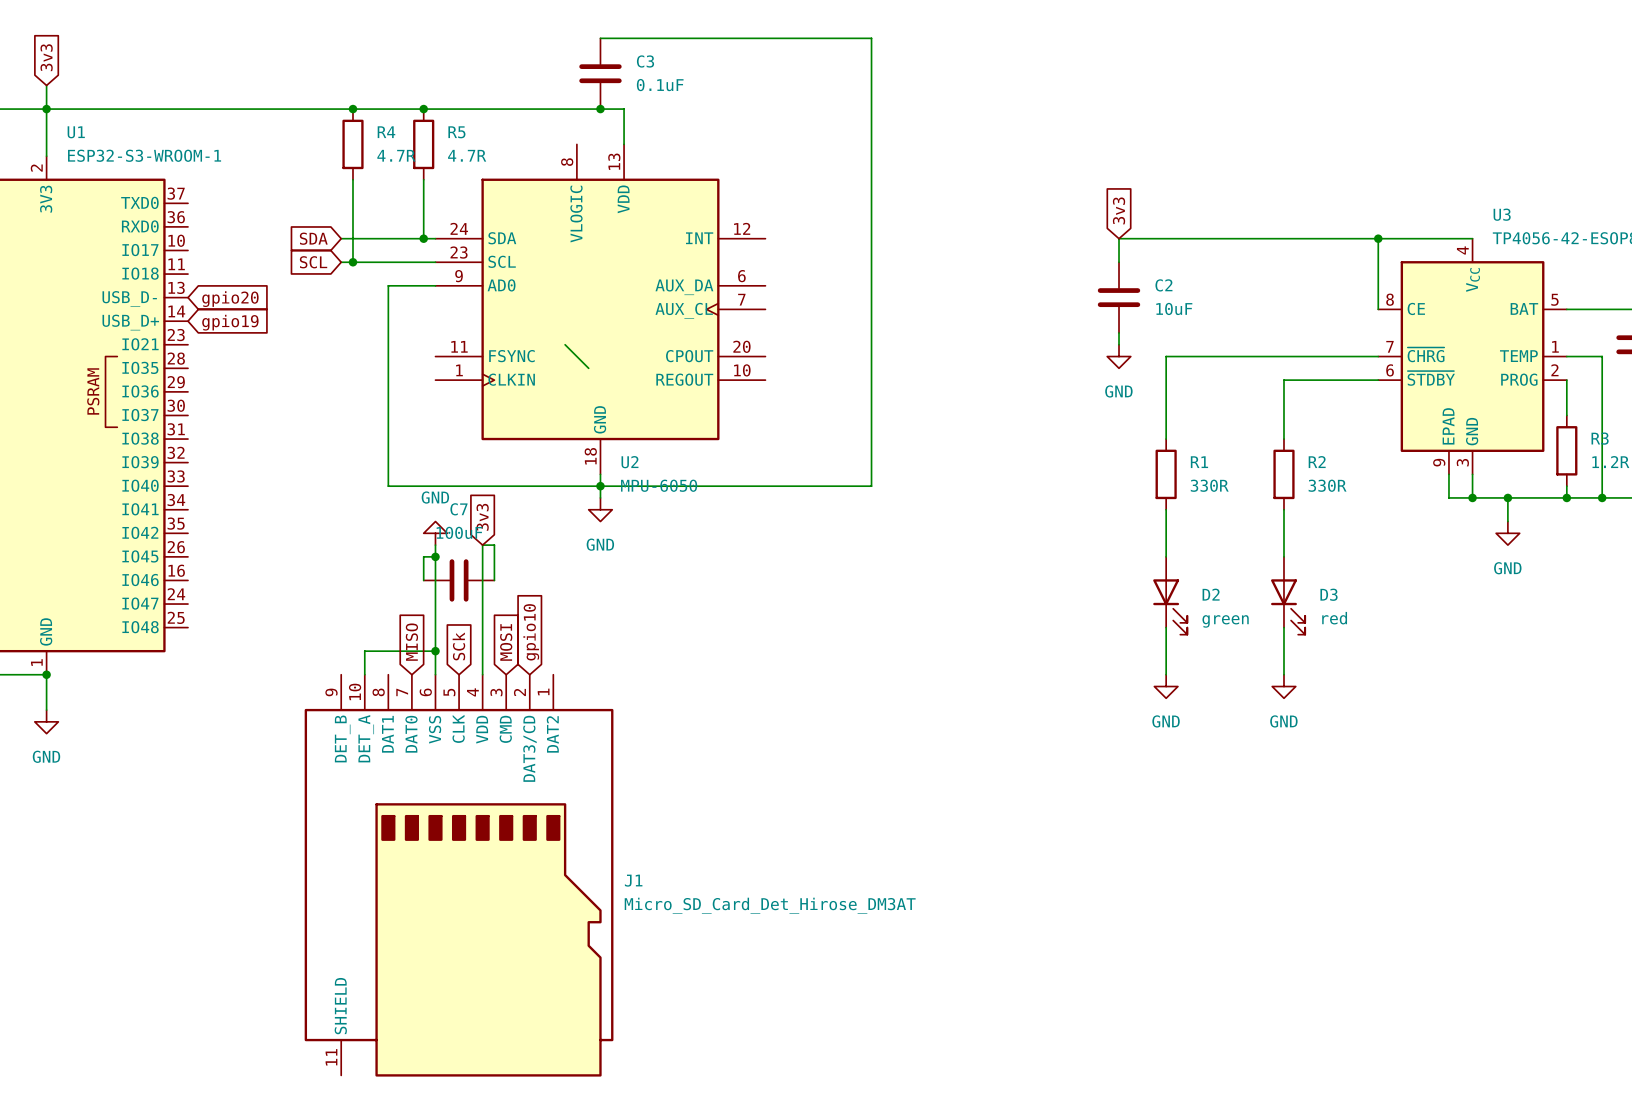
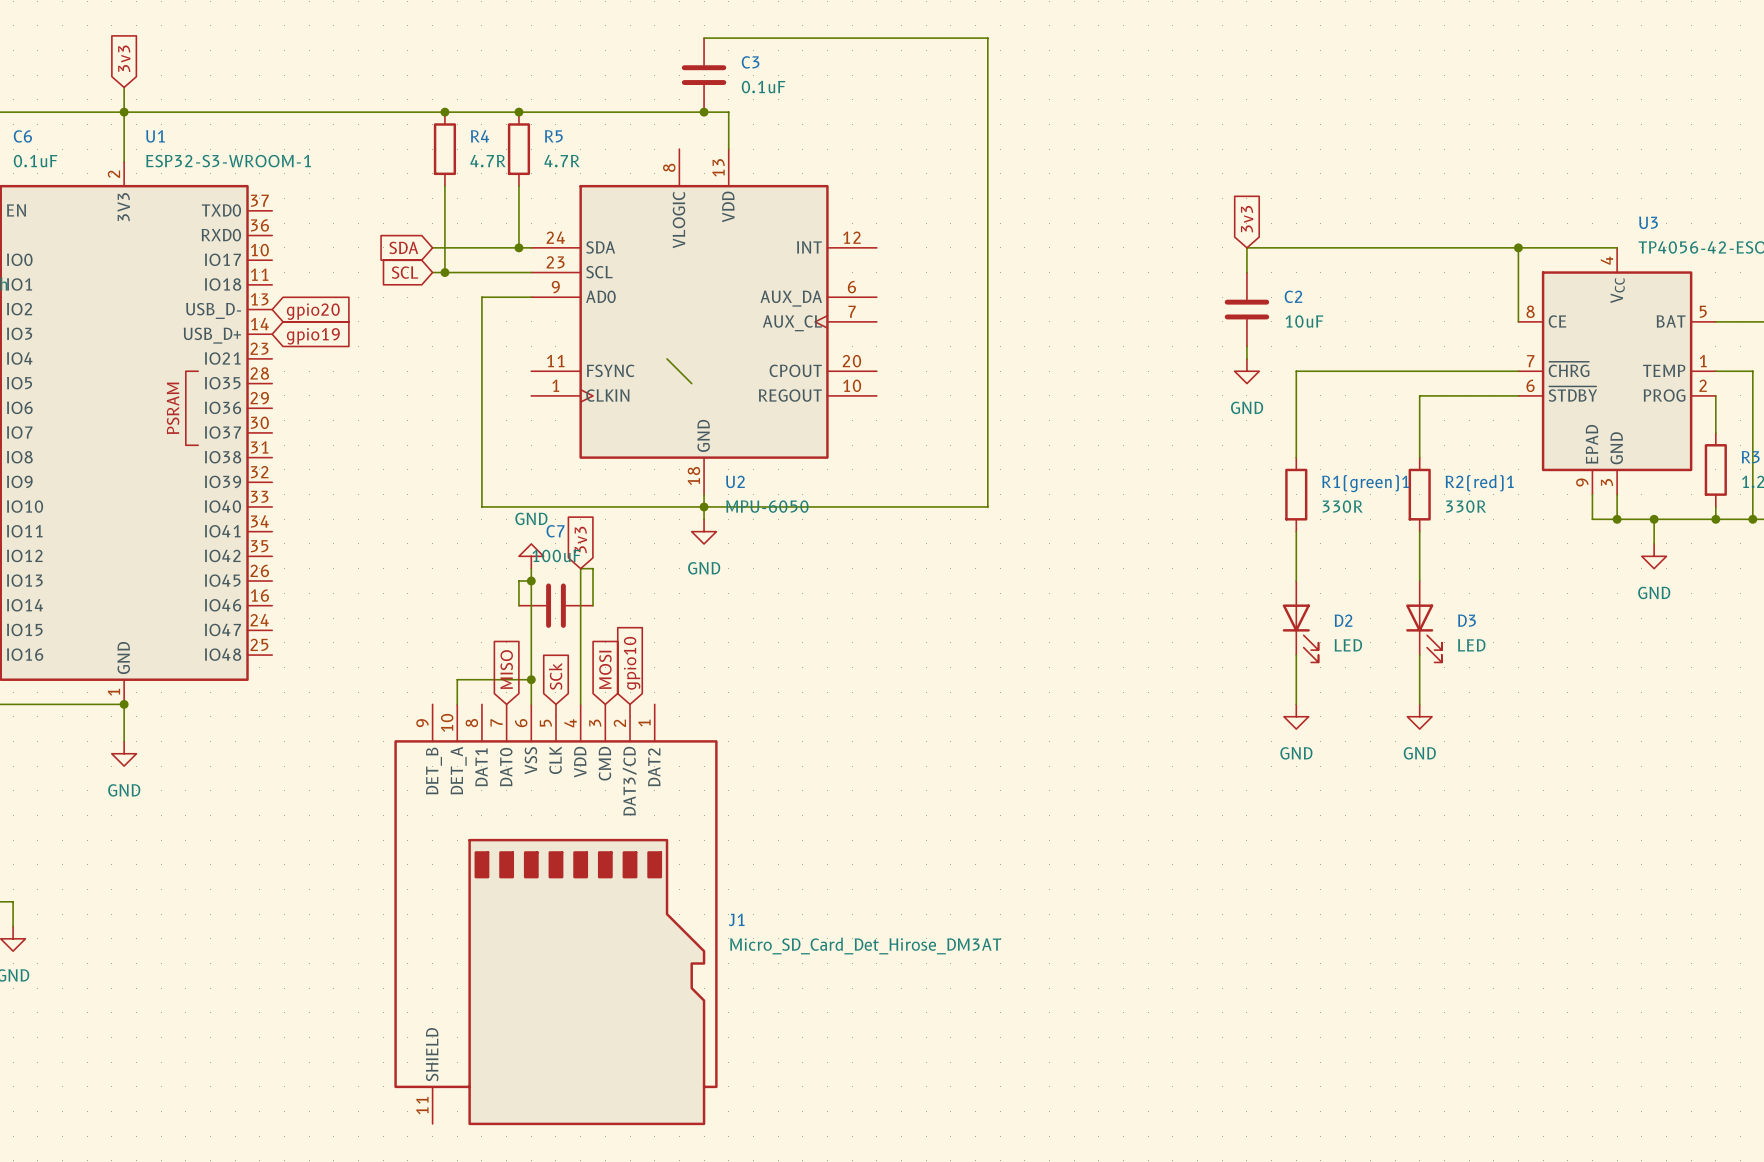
R1 name: R1 (1199, 462) -> R1(green)1 (1365, 483)
R2 name: R2 (1317, 462) -> R2(red)1 (1479, 483)
D3 value: red (1334, 618) -> LED (1471, 645)
D2 value: green (1225, 621) -> LED (1348, 645)

